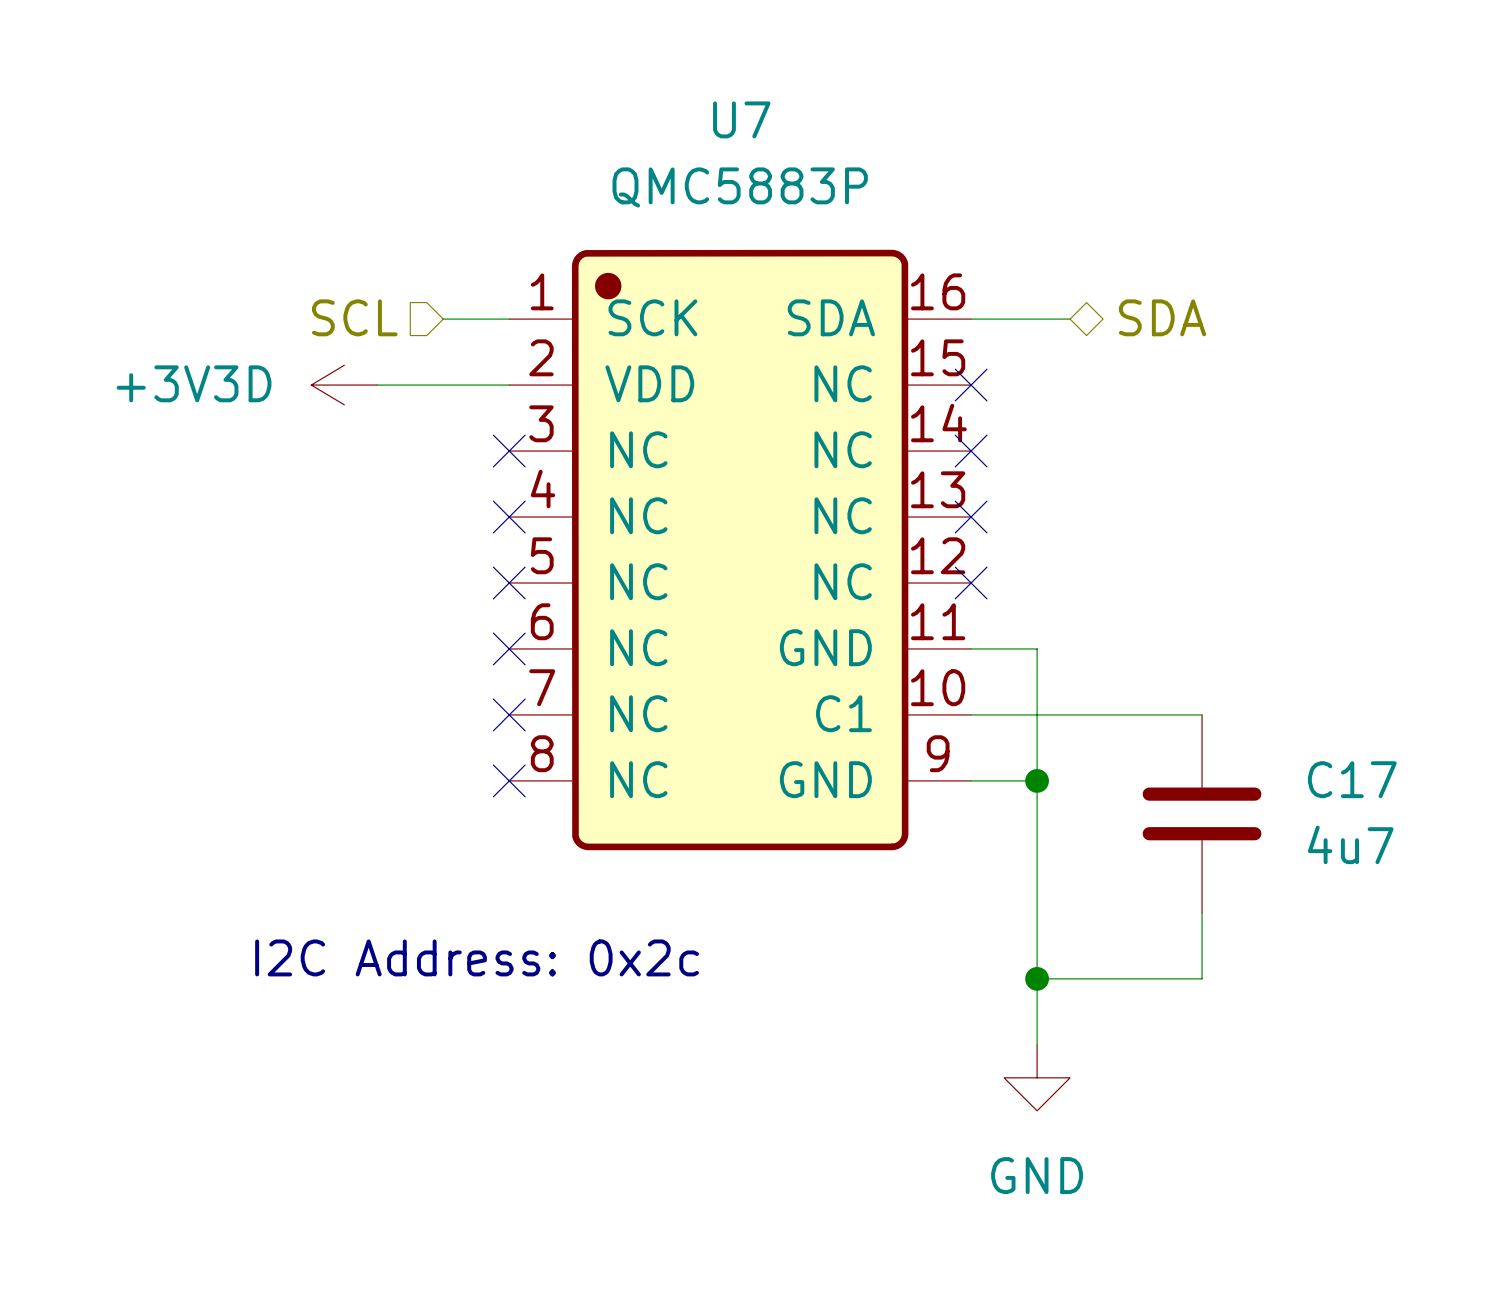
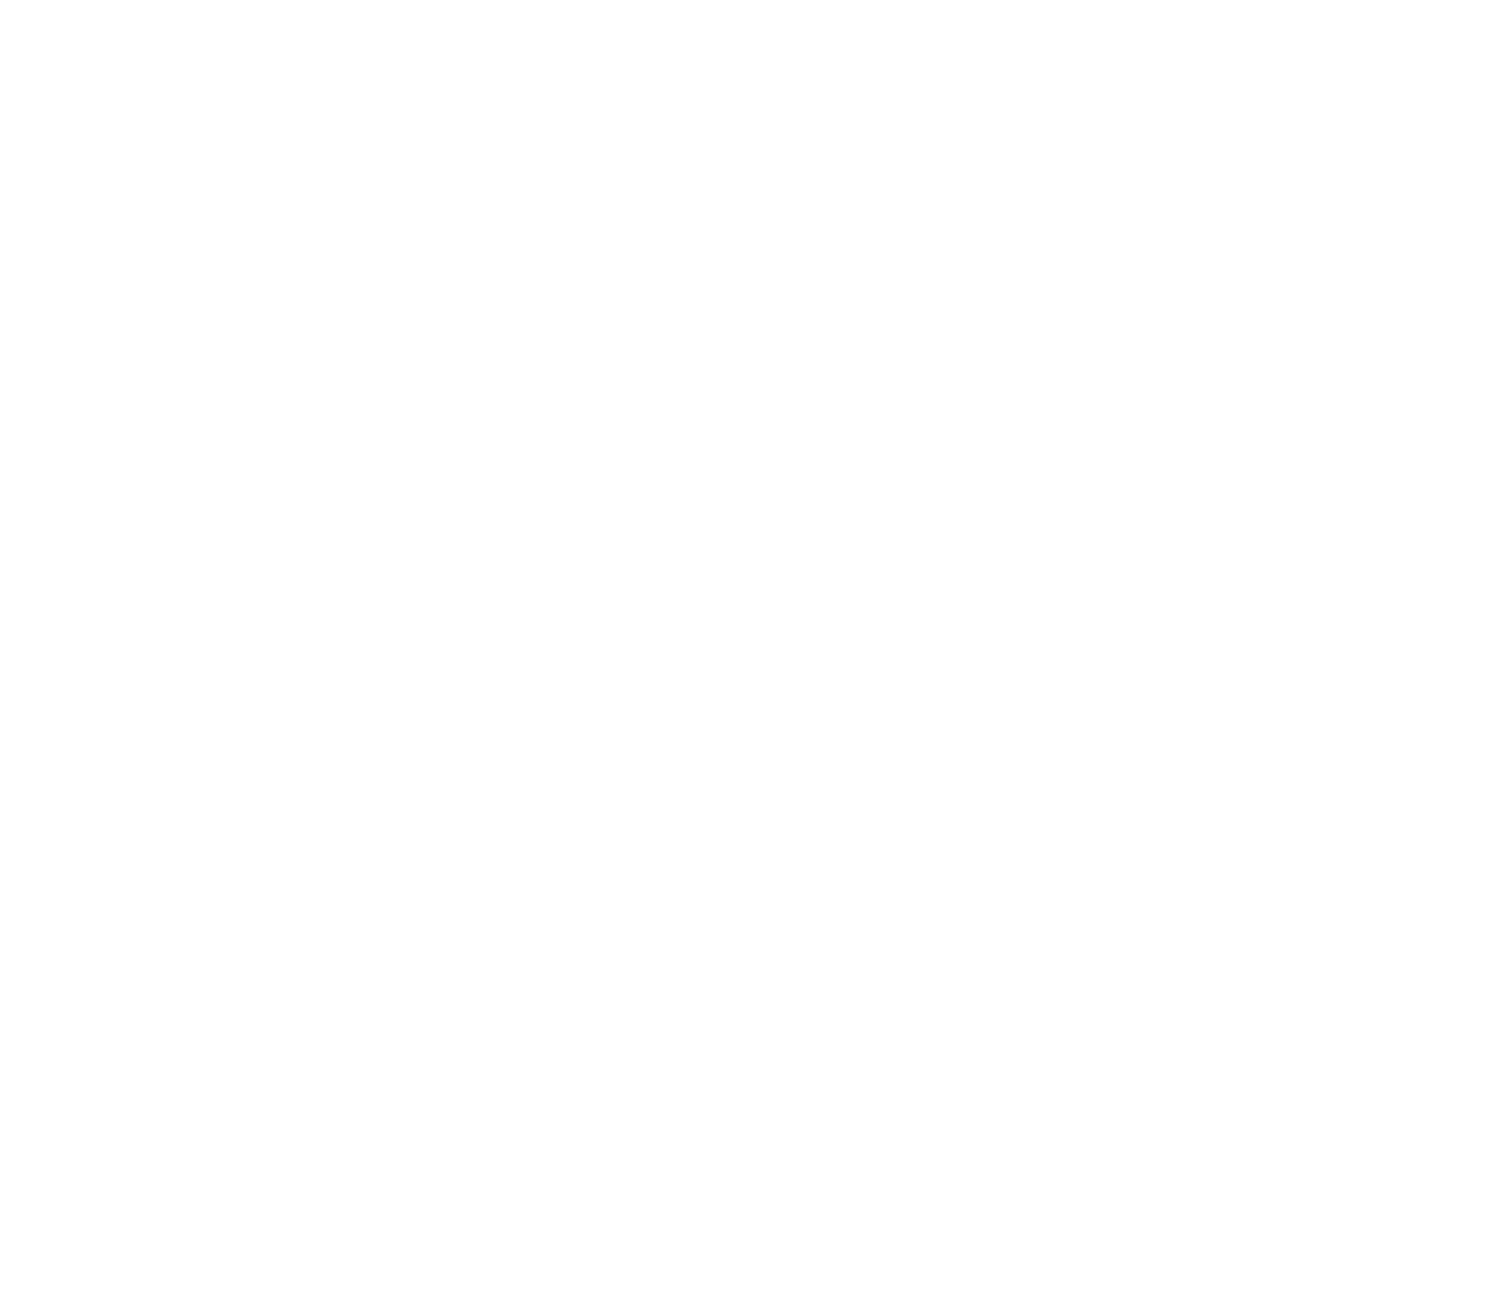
hierarchical label: SCL (354, 317) -> none
hierarchical label: SDA (1162, 317) -> none
wire: (443, 319) (509, 319) -> none
wire: (971, 319) (1070, 319) -> none
power symbol: +3V3D (344, 385) -> none
wire: (377, 385) (509, 385) -> none
no-connect mark: (971, 385) -> none
no-connect mark: (509, 451) -> none
no-connect mark: (971, 451) -> none
no-connect mark: (509, 517) -> none
no-connect mark: (971, 517) -> none
U7: QMC5883P (740, 550) -> none
no-connect mark: (509, 582) -> none
no-connect mark: (971, 582) -> none
no-connect mark: (509, 648) -> none
wire: (971, 648) (1037, 648) (1037, 1044) -> none
no-connect mark: (509, 714) -> none
wire: (971, 714) (1202, 714) -> none
no-connect mark: (509, 780) -> none
wire: (971, 780) (1037, 780) -> none
junction: (1037, 780) -> none
C17: 4u7 (1202, 813) -> none
wire: (1202, 912) (1202, 978) (1037, 978) -> none
text: I2C Address: 0x2c (477, 957) -> none
junction: (1037, 978) -> none
power symbol: GND (1037, 1077) -> none

